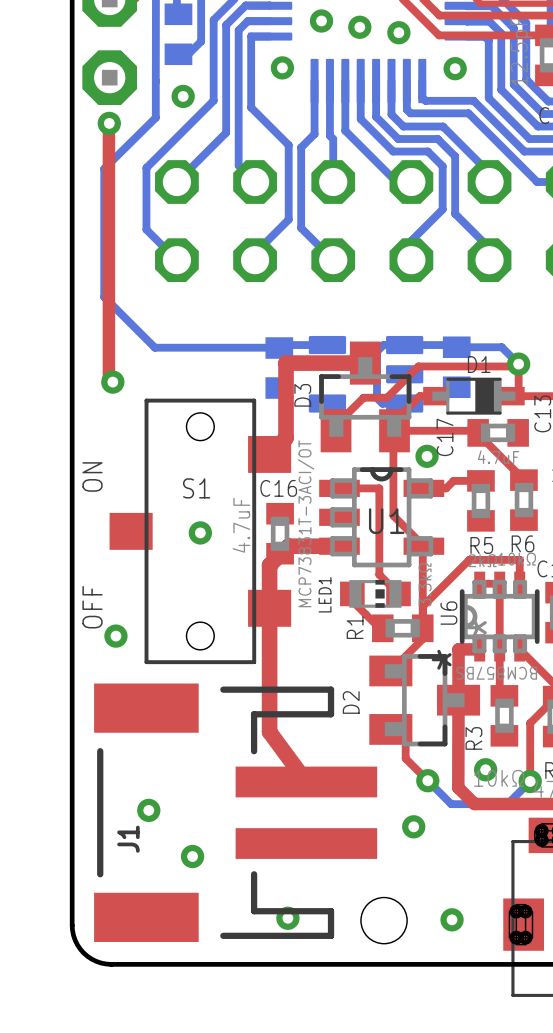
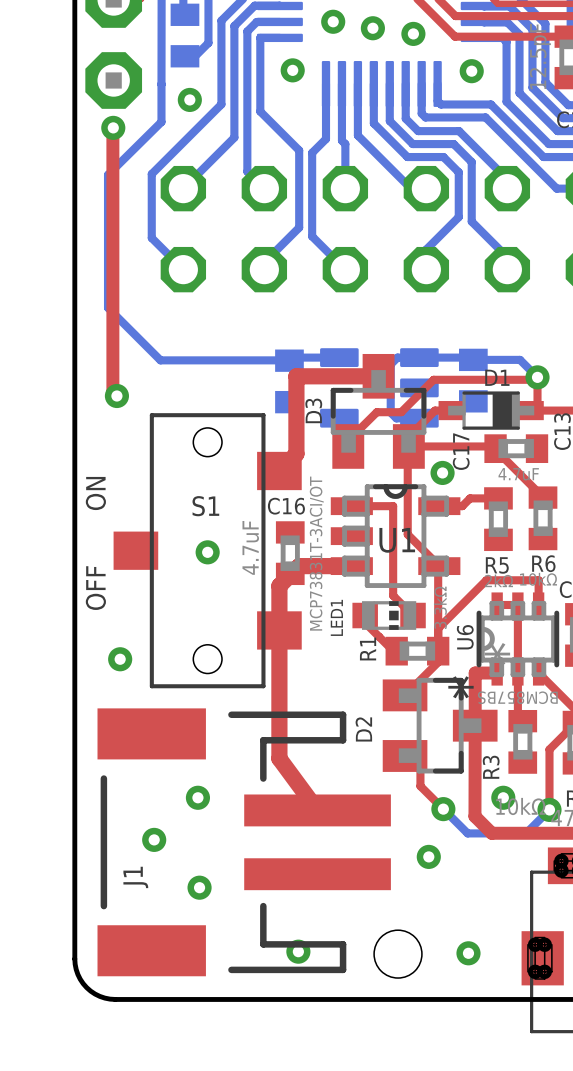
via: none -> (197, 797)

